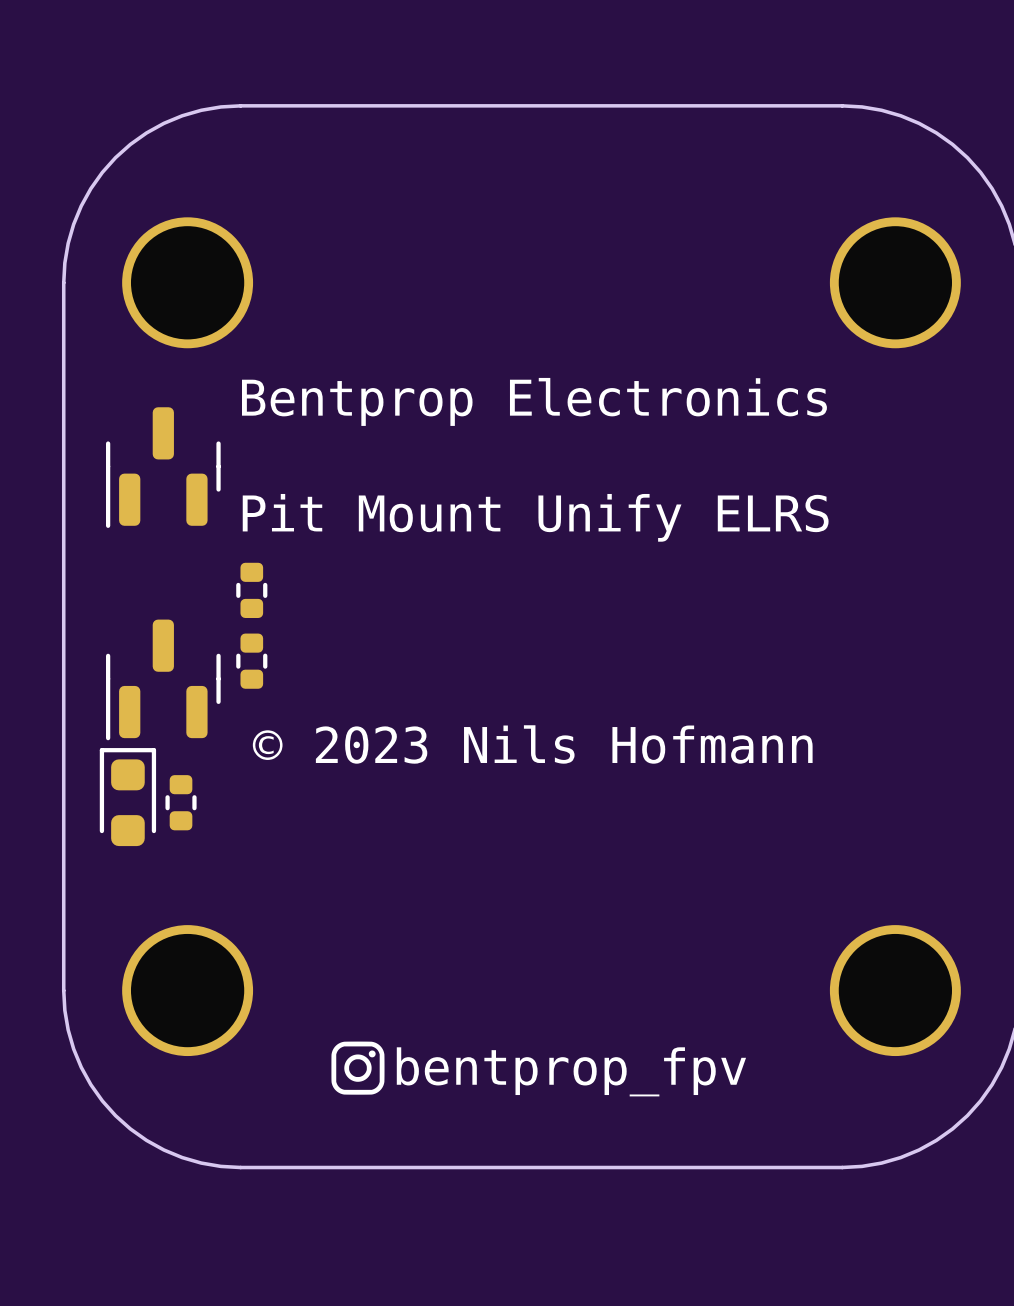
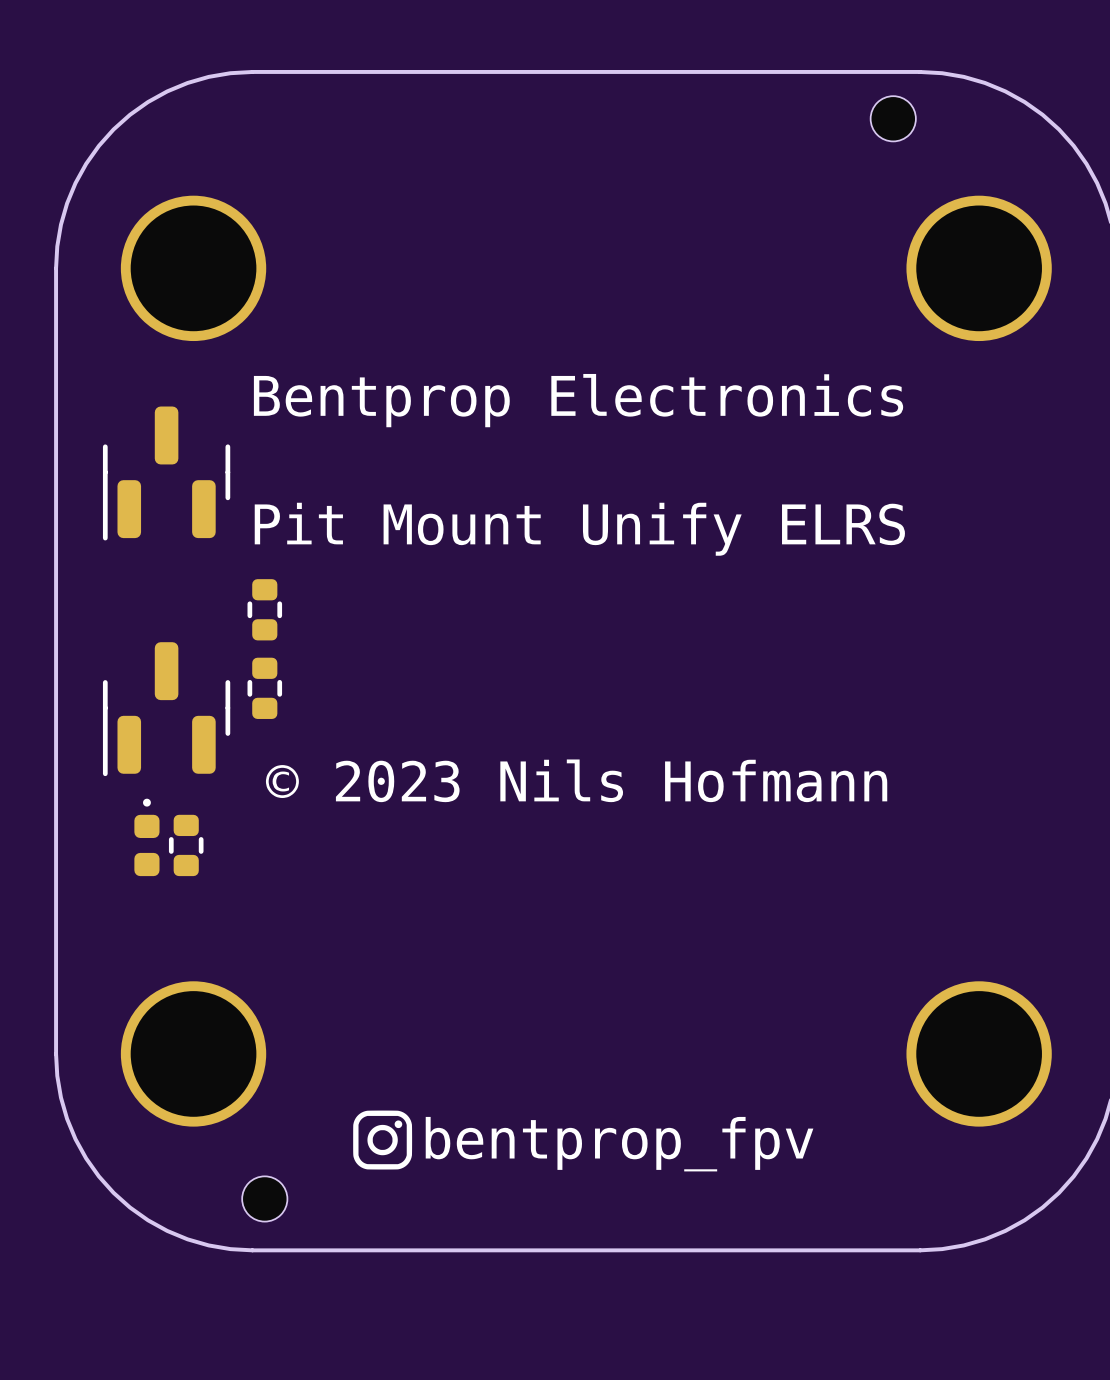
part: none -> (893, 118)
part footprint: [99, 748, 157, 847] -> [134, 798, 160, 877]
part: none -> (264, 1198)

